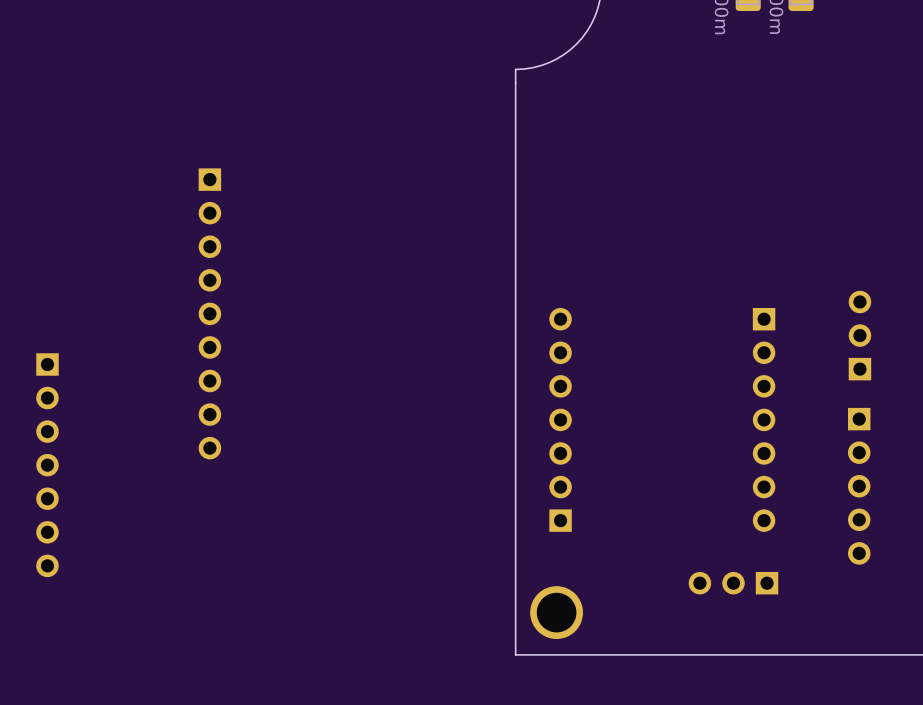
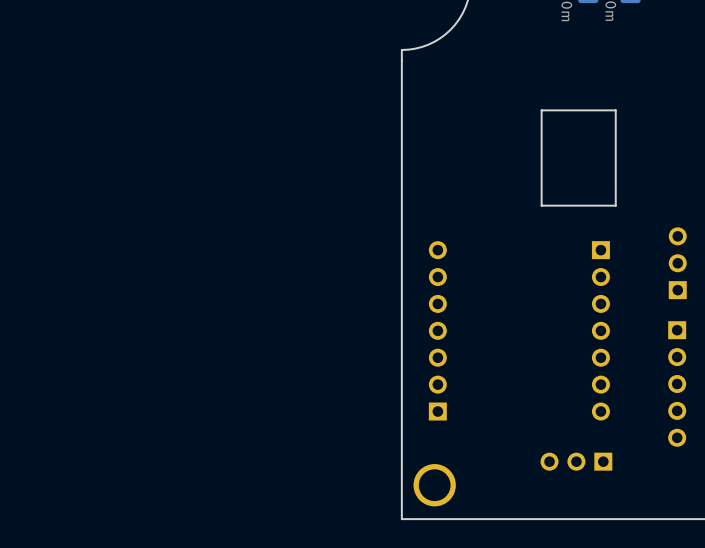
board edge: none -> (615, 110) (541, 110) (541, 205) (615, 205) (615, 110)
part: (209, 313) -> none
part: (47, 465) -> none

